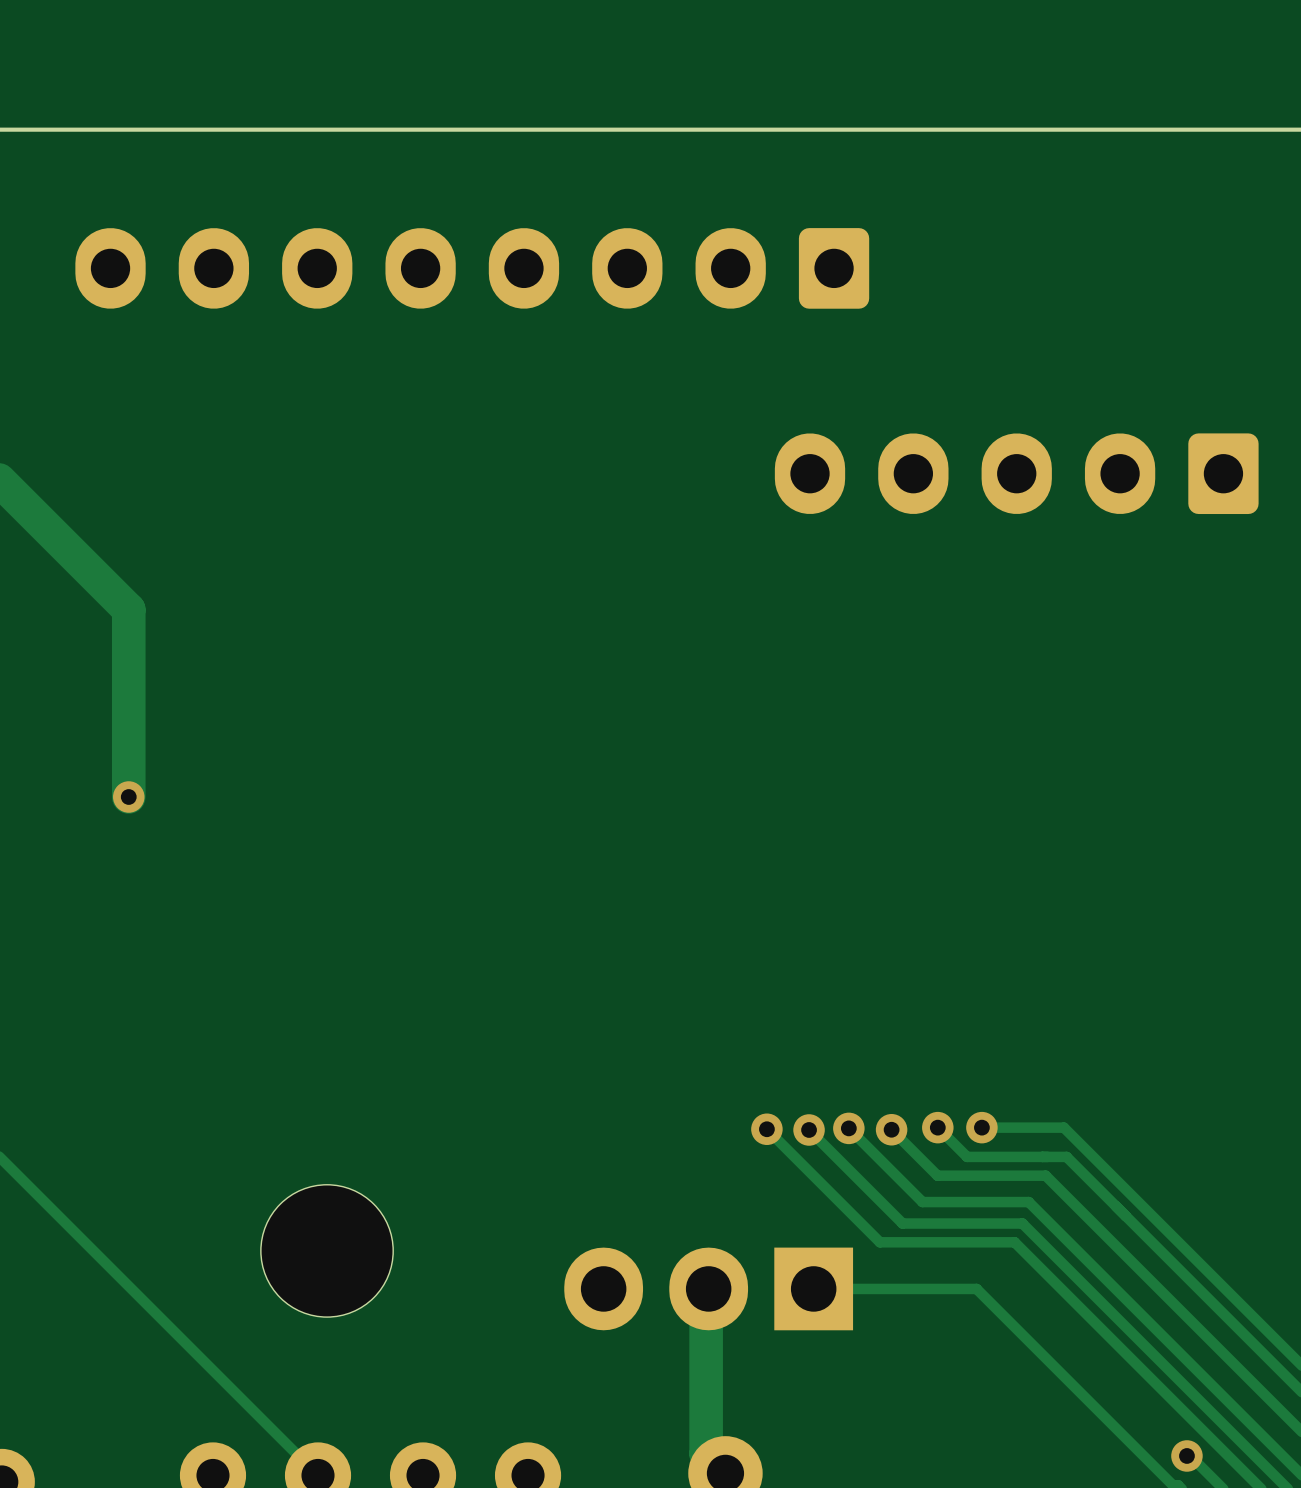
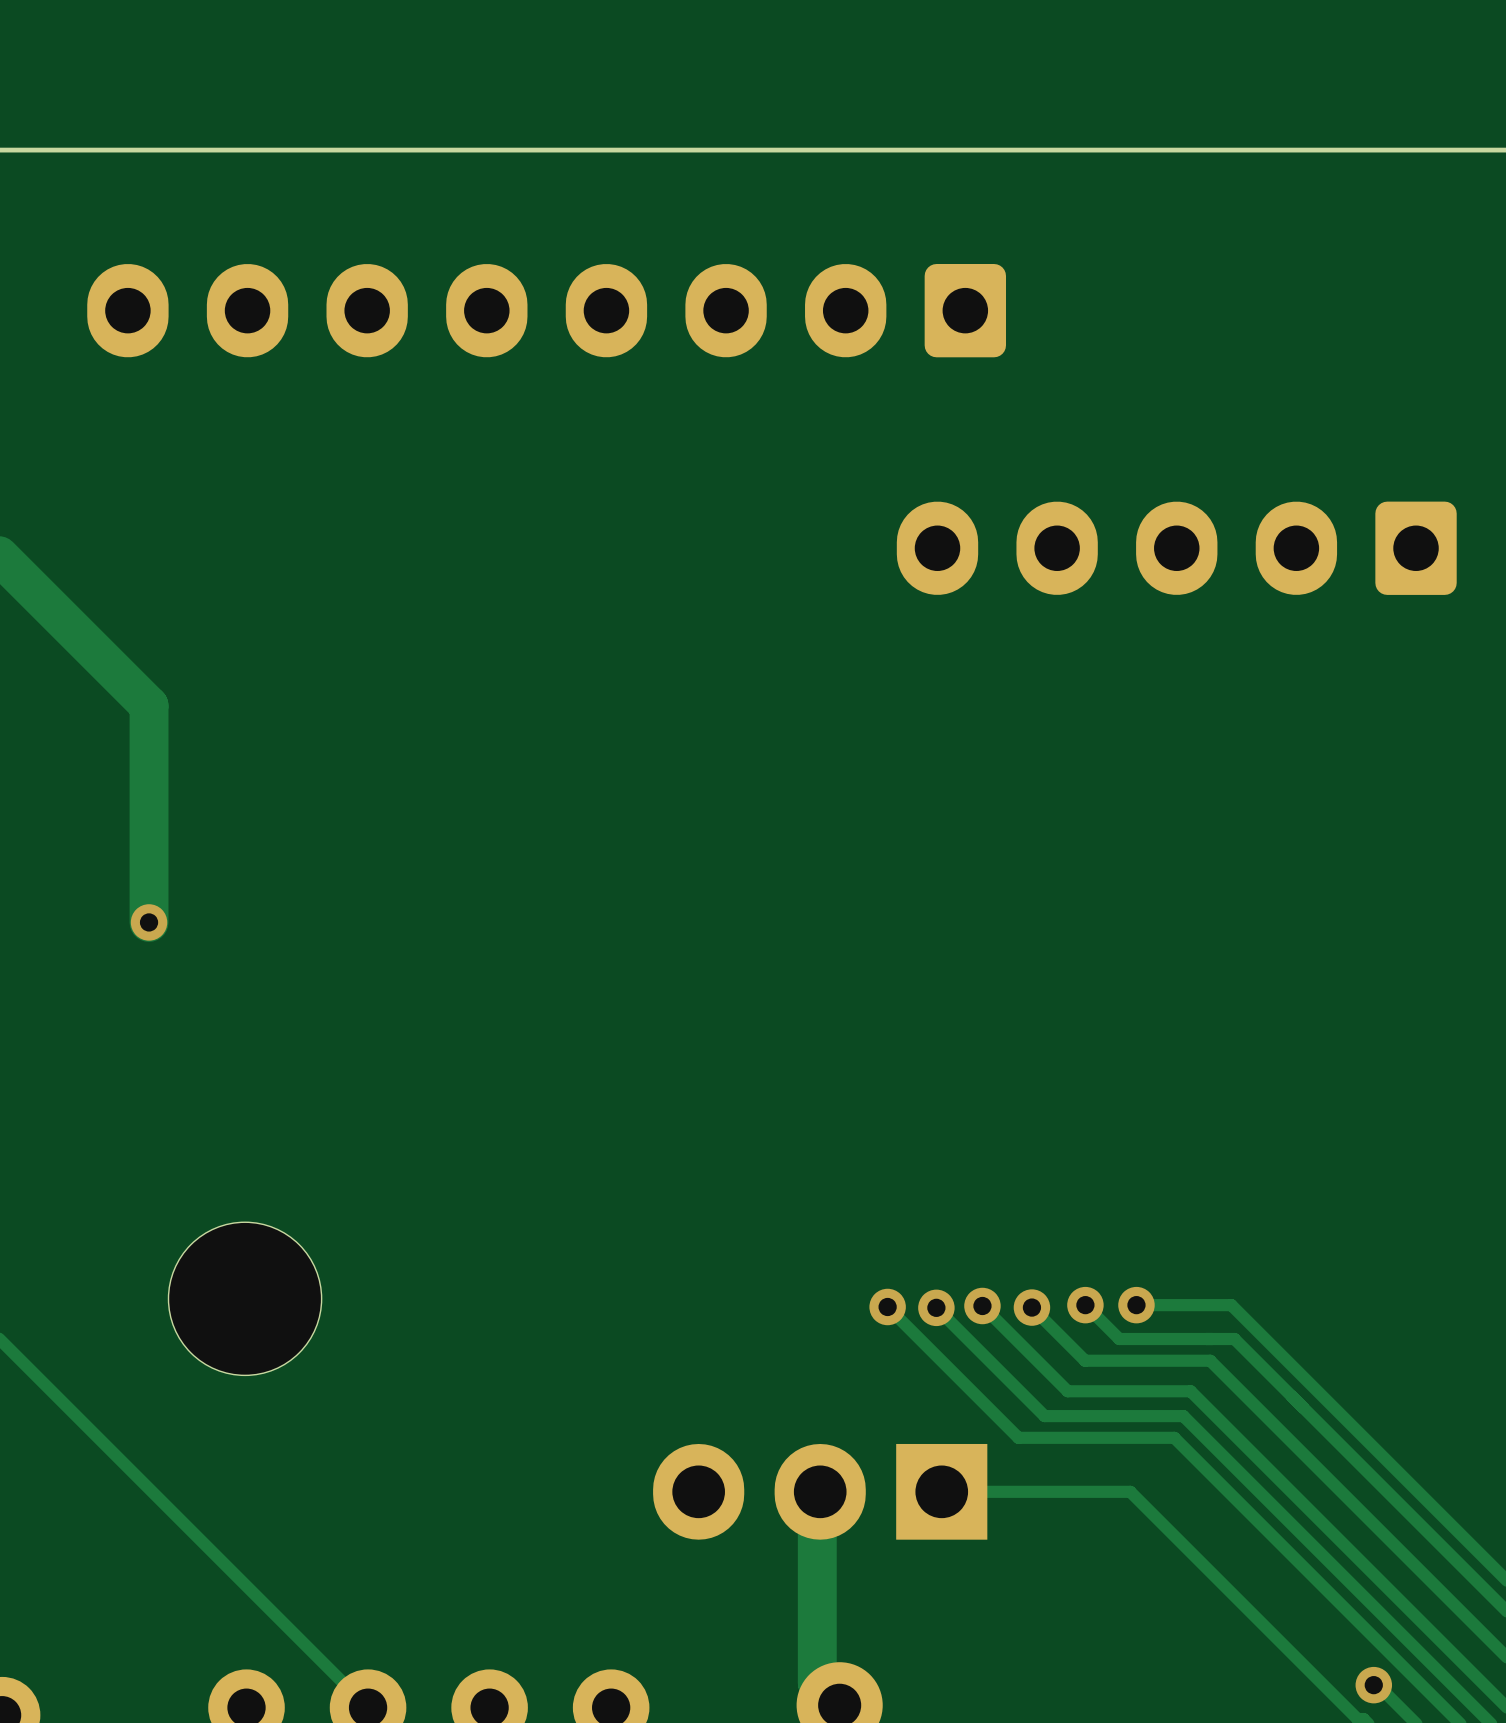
part position: (327, 1250) -> (245, 1298)

